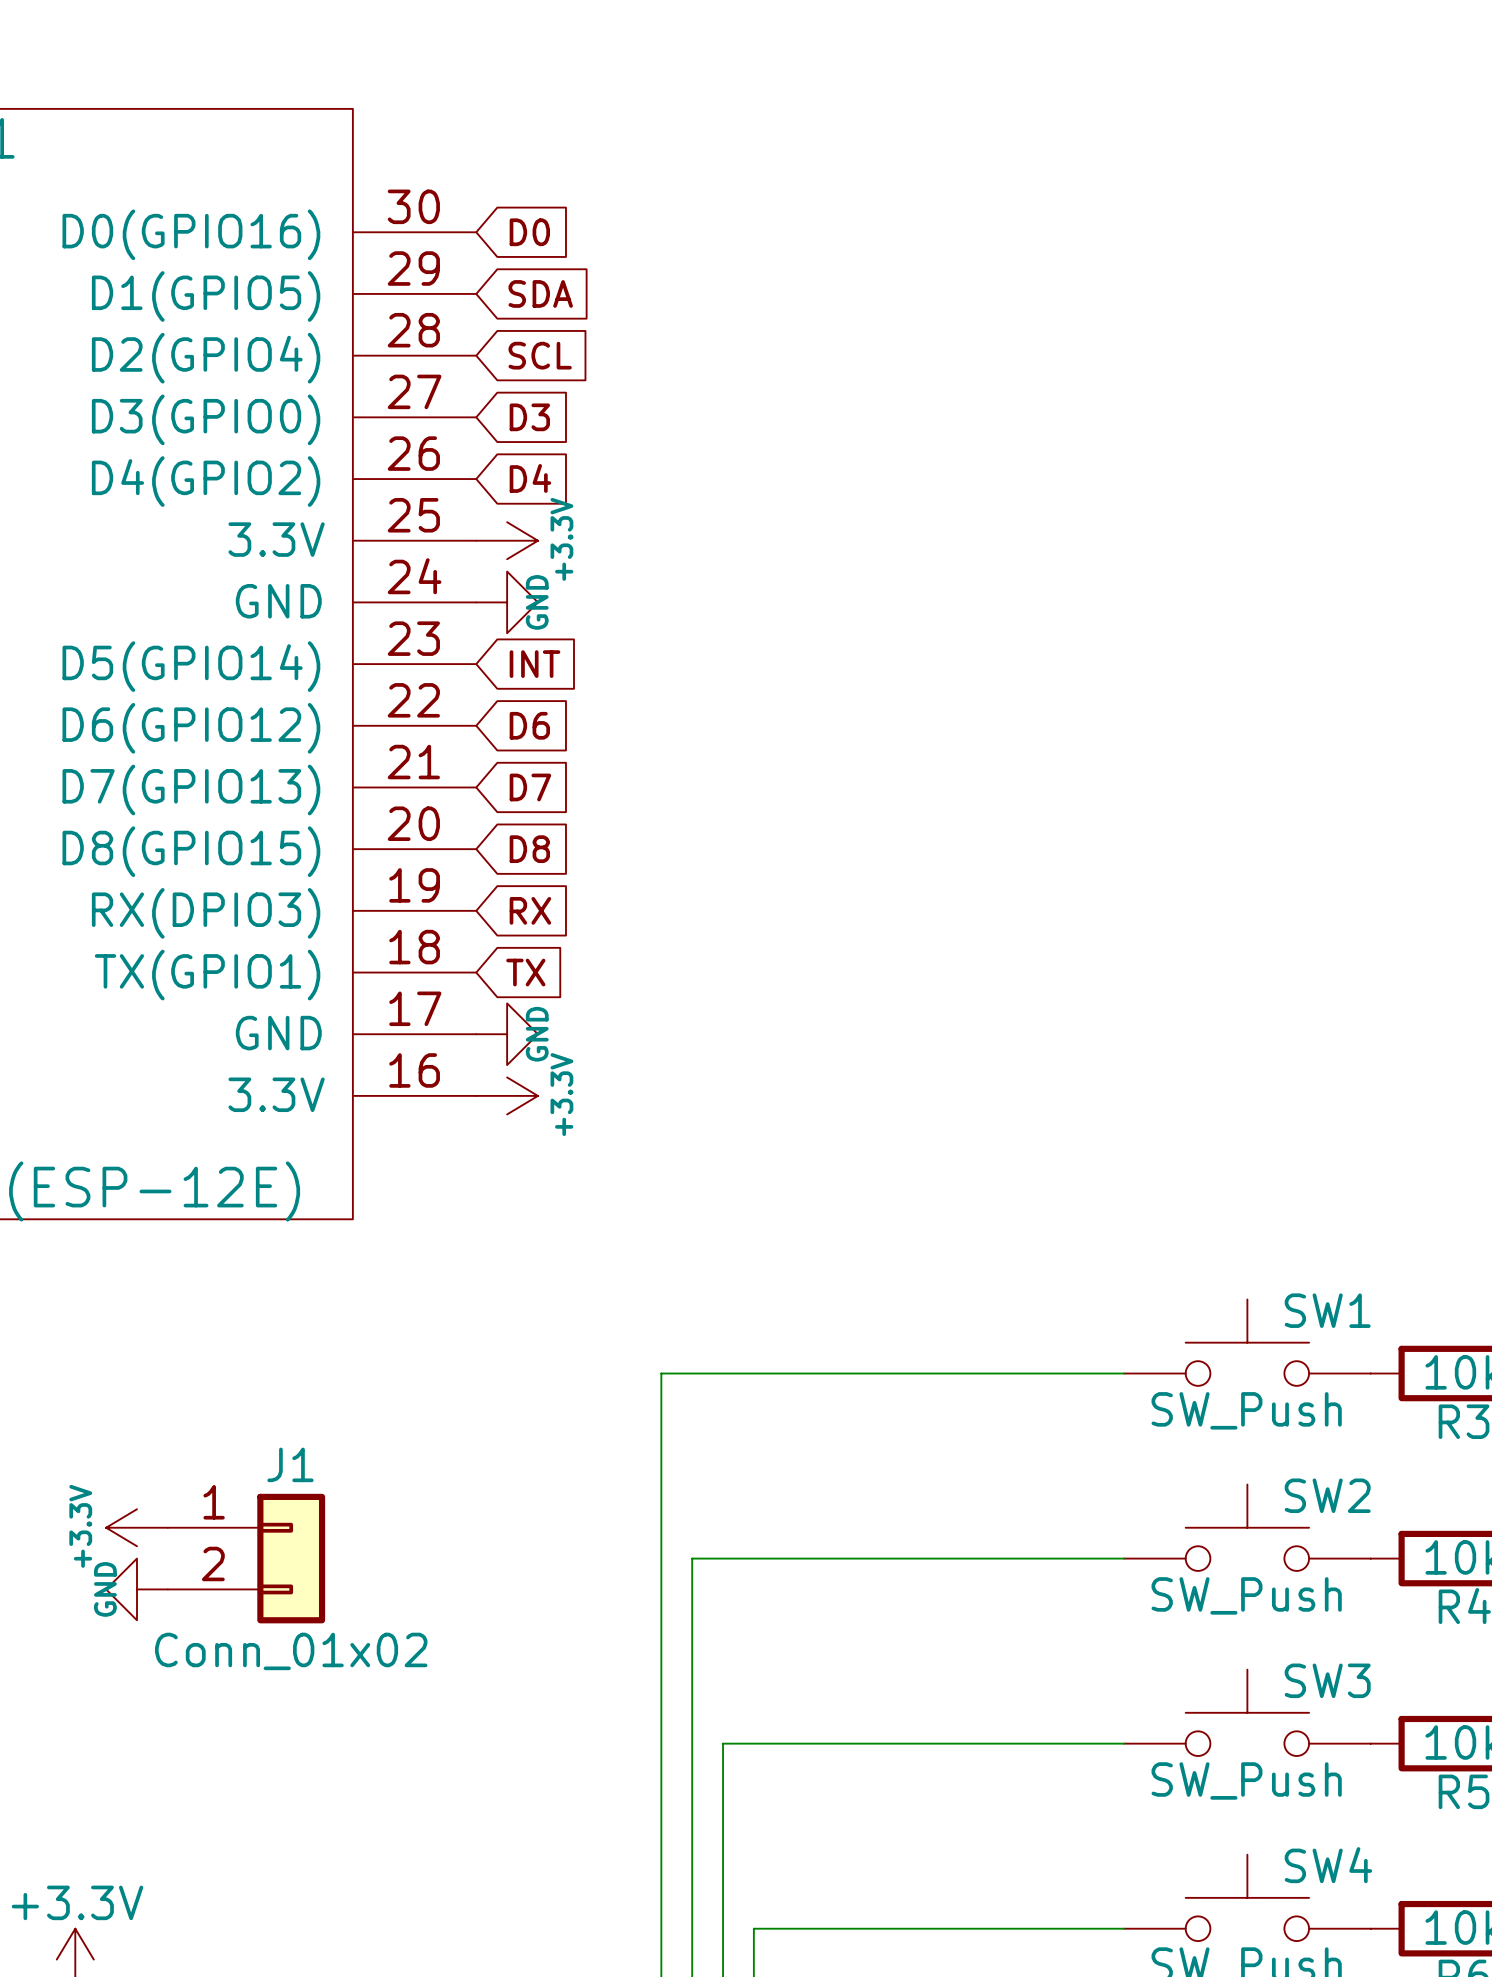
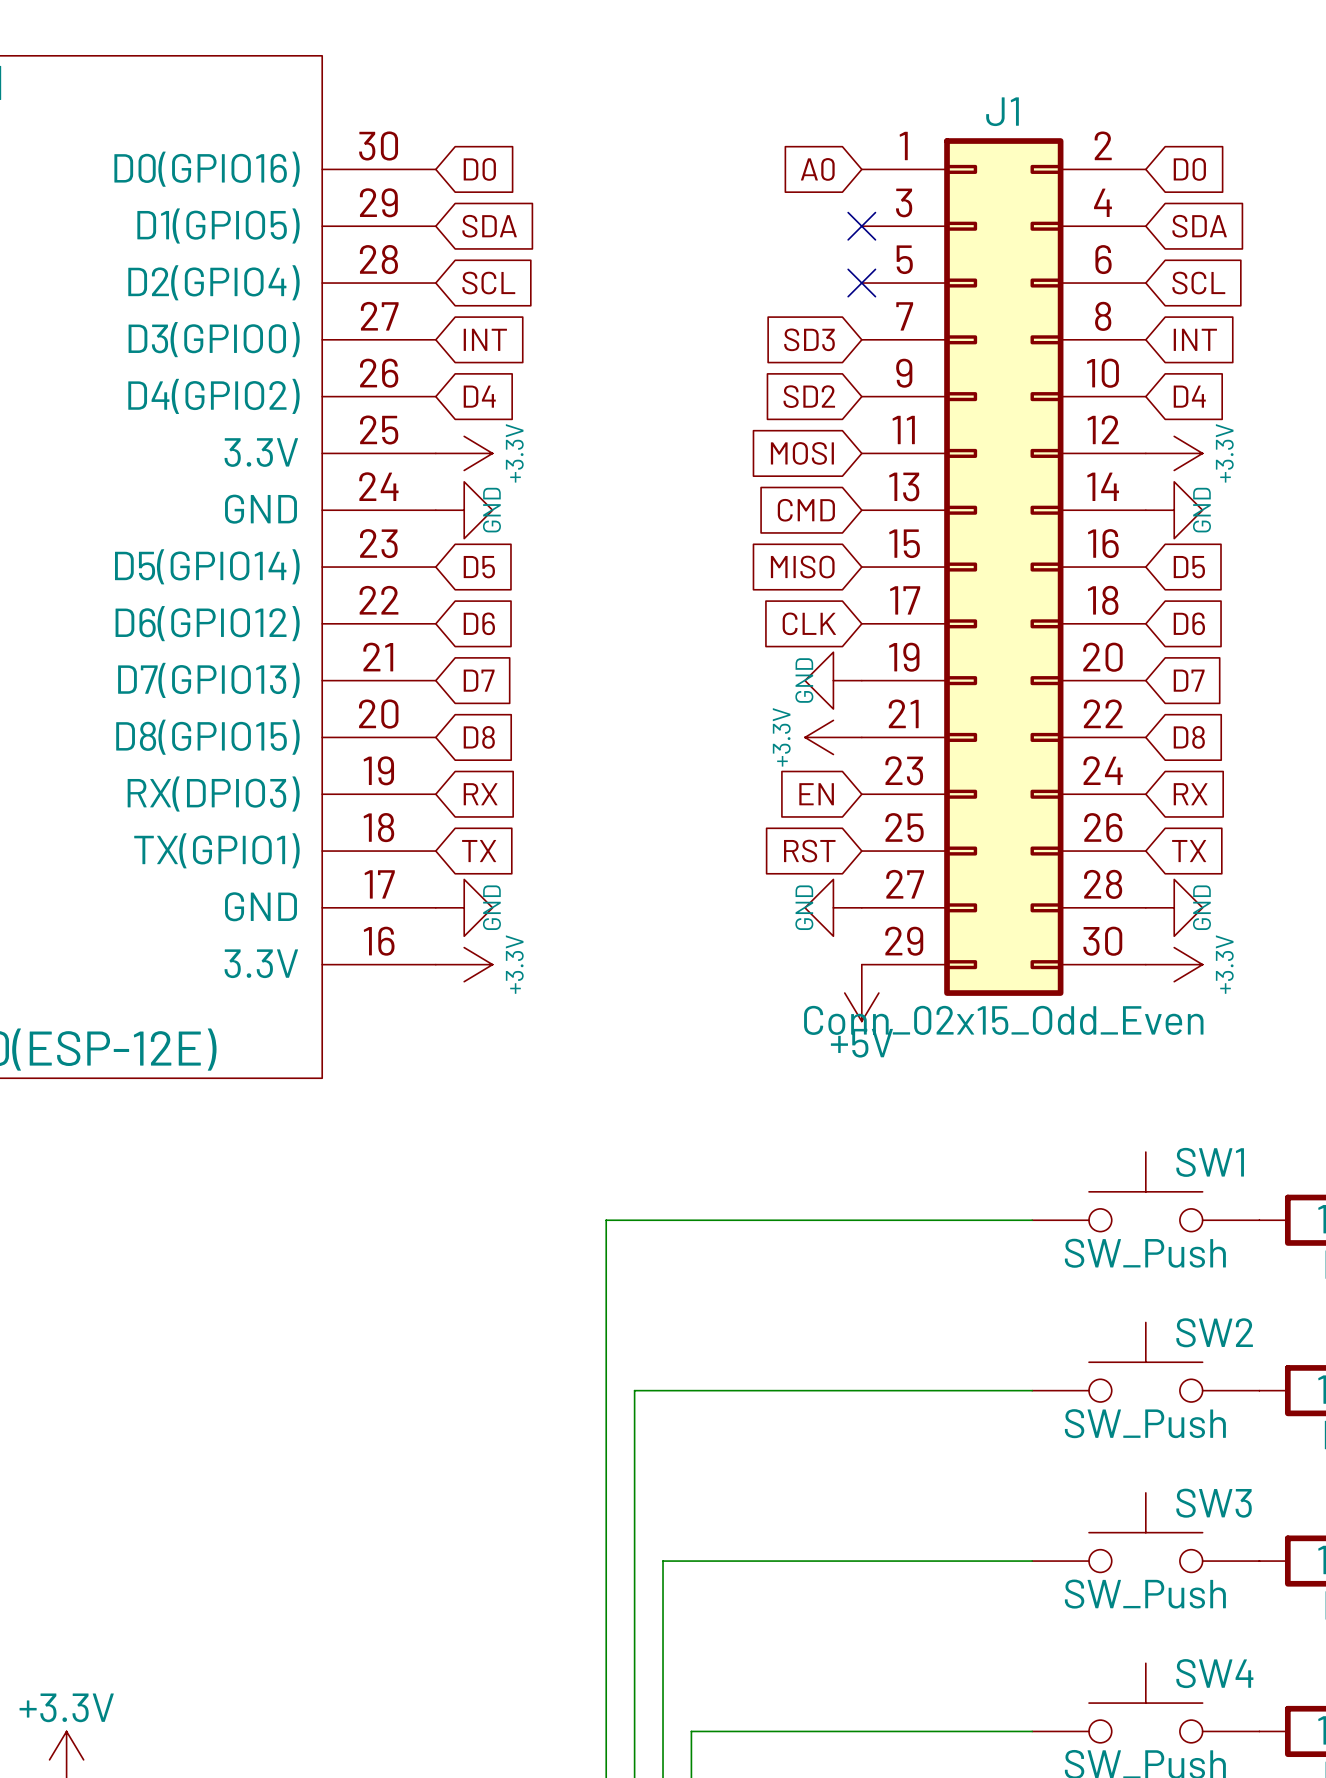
global label: none -> A0 (817, 169)
global label: none -> D0 (1189, 169)
no-connect mark: none -> (861, 226)
global label: none -> SDA (1199, 226)
no-connect mark: none -> (861, 283)
global label: none -> SCL (1198, 283)
global label: D3 (529, 417) -> INT (485, 339)
global label: none -> SD3 (809, 339)
global label: none -> INT (1195, 339)
global label: none -> D4 (1189, 396)
global label: none -> SD2 (809, 396)
global label: none -> MOSI (802, 453)
power symbol: none -> +3.3V (1174, 453)
global label: none -> CMD (806, 510)
power symbol: none -> GND (1174, 510)
global label: INT (534, 664) -> D5 (479, 567)
global label: none -> MISO (802, 567)
global label: none -> D5 (1189, 567)
global label: none -> CLK (809, 623)
global label: none -> D6 (1189, 623)
power symbol: none -> GND (833, 680)
global label: none -> D7 (1189, 680)
power symbol: none -> +3.3V (833, 737)
global label: none -> D8 (1189, 737)
global label: none -> EN (816, 794)
global label: none -> RX (1190, 794)
global label: none -> RST (809, 851)
global label: none -> TX (1189, 851)
power symbol: none -> GND (833, 907)
power symbol: none -> GND (1174, 907)
power symbol: none -> +3.3V (1174, 964)
power symbol: none -> +5V (861, 993)
J1 name position: J1 (290, 1464) -> J1 (1002, 111)
J1 symbol: [167, 1493, 326, 1624] -> [861, 138, 1146, 996]
power symbol: +3.3V (136, 1527) -> none
power symbol: GND (136, 1589) -> none
J1 value: Conn_01x02 (291, 1651) -> Conn_02x15_Odd_Even (1003, 1020)

